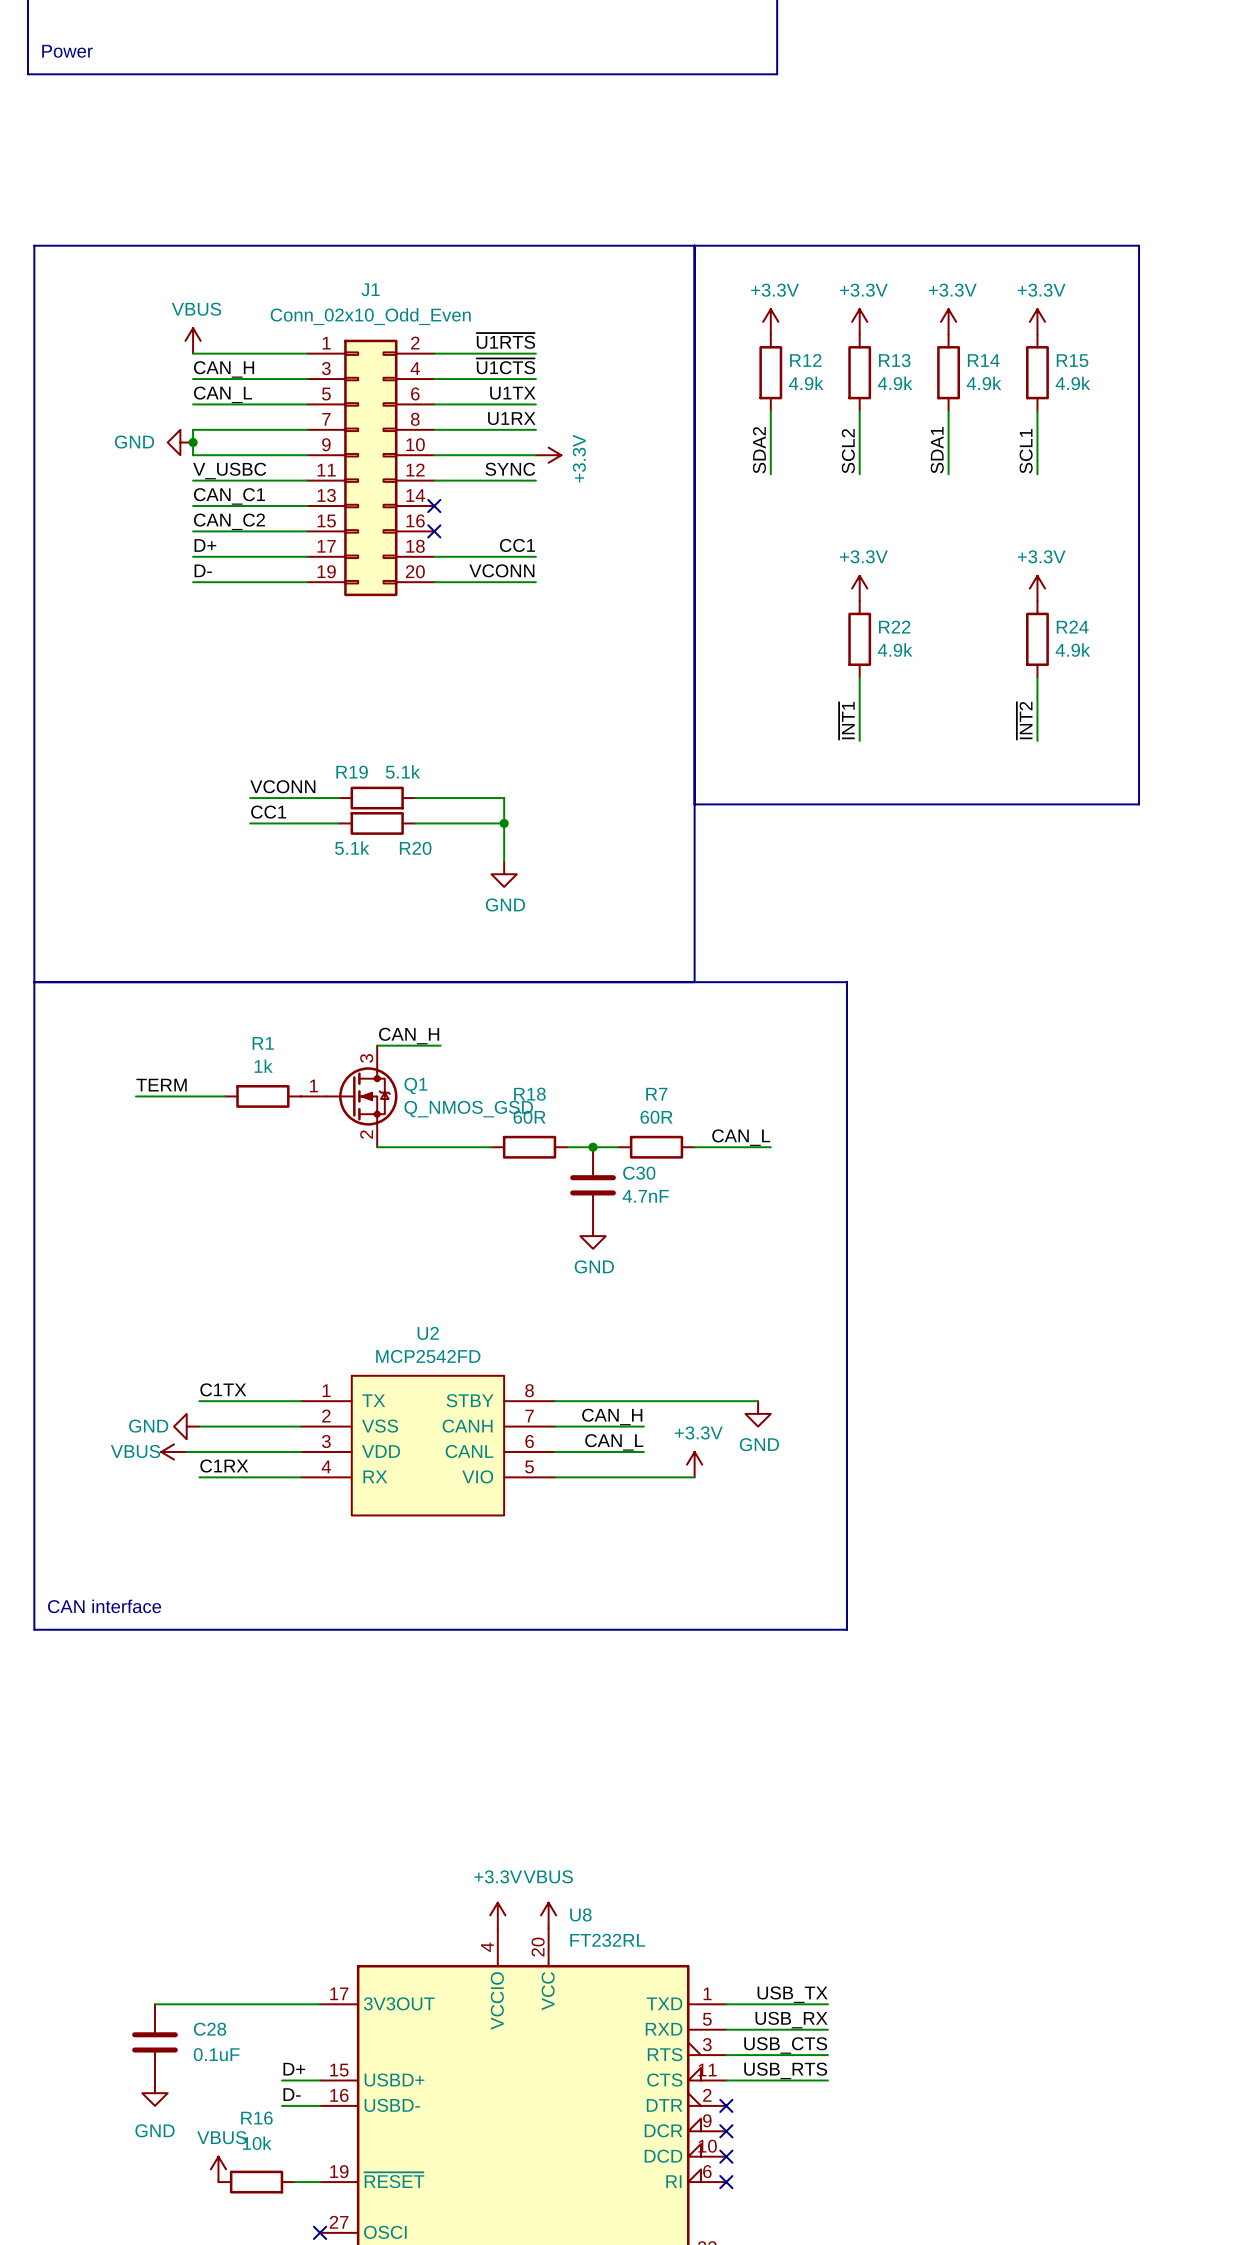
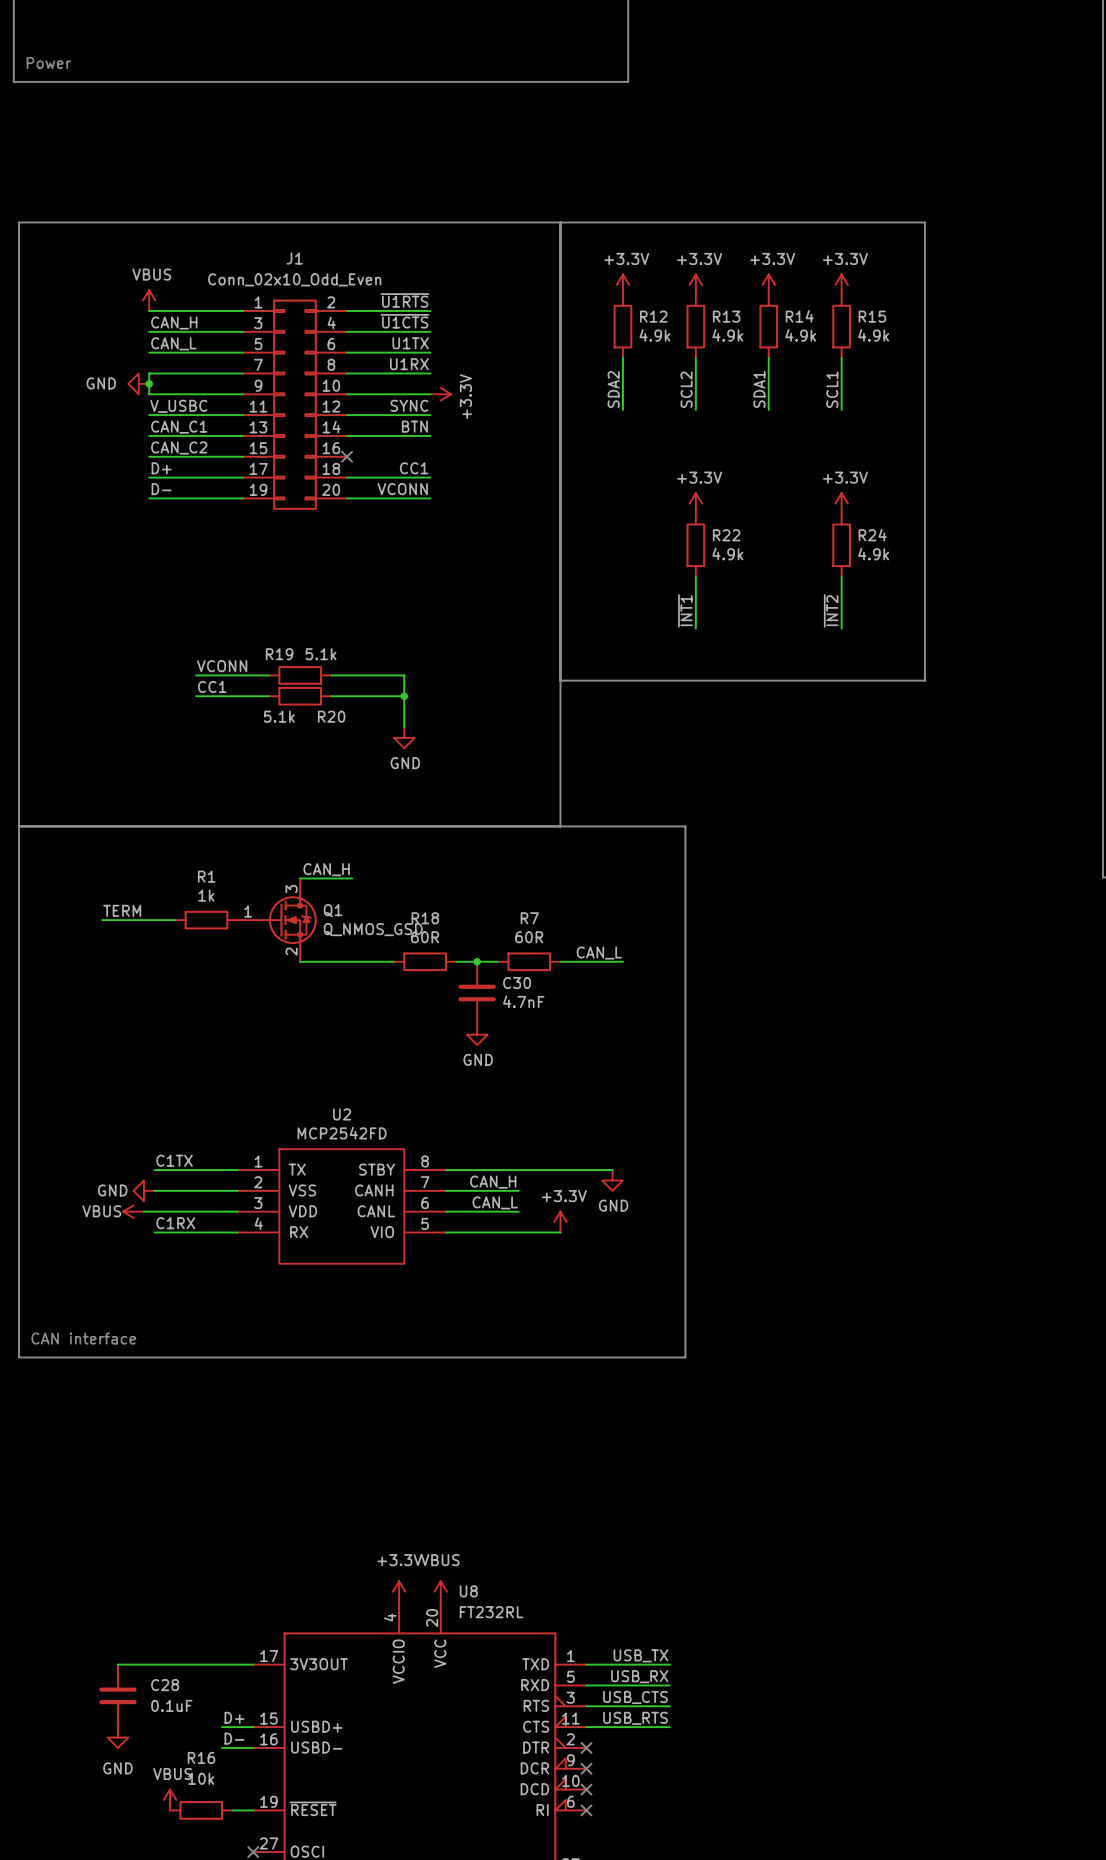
label: none -> BTN (414, 426)
wire: none -> (347, 435) (430, 435)
no-connect mark: (434, 506) -> none

